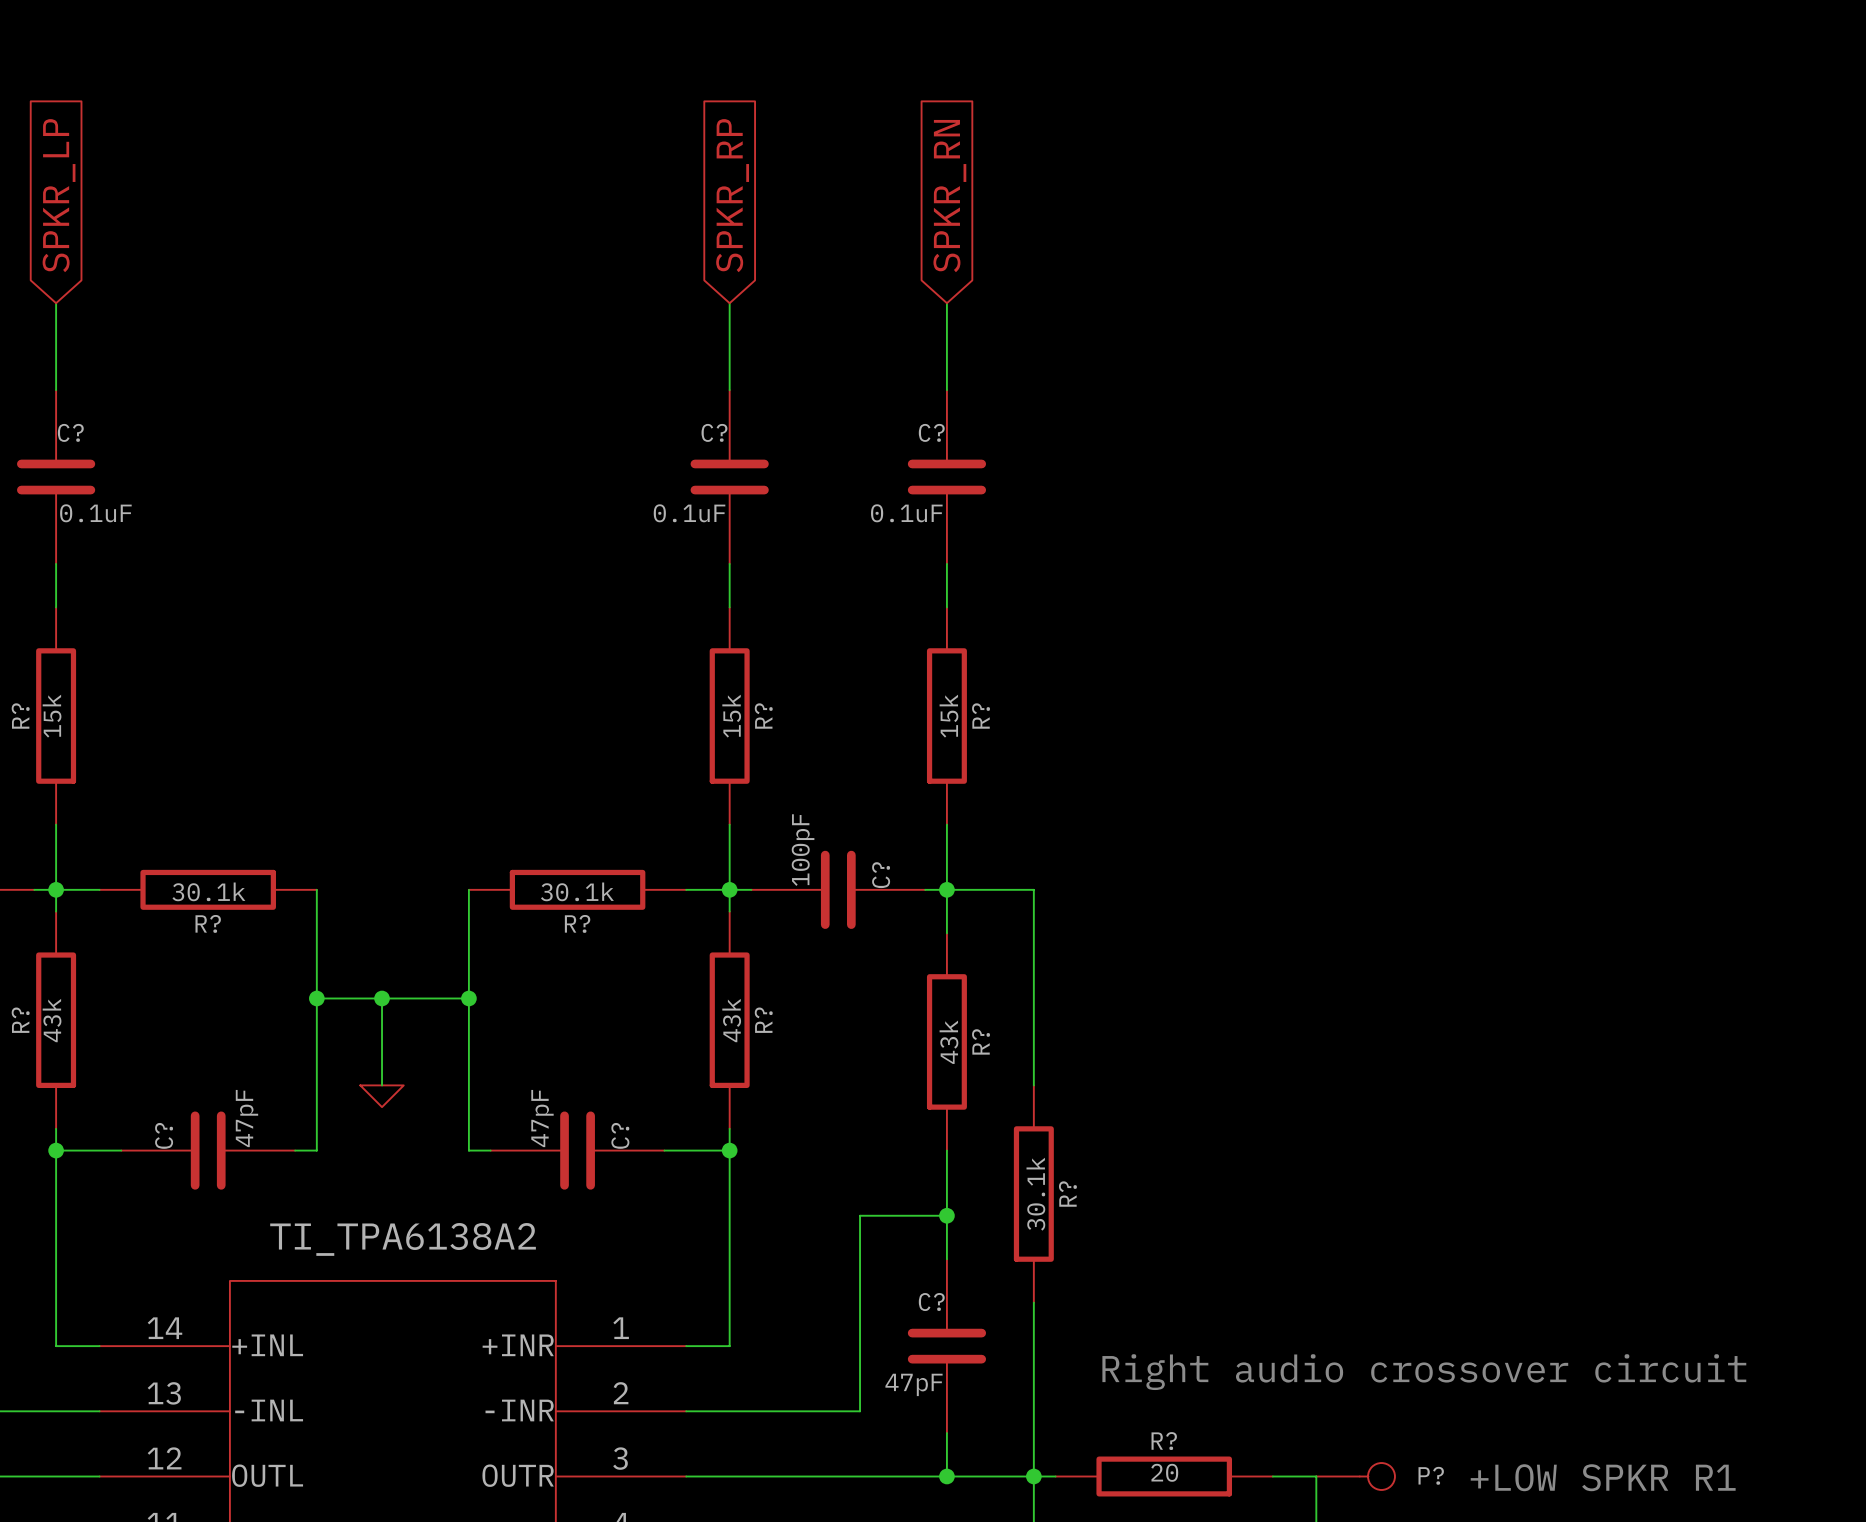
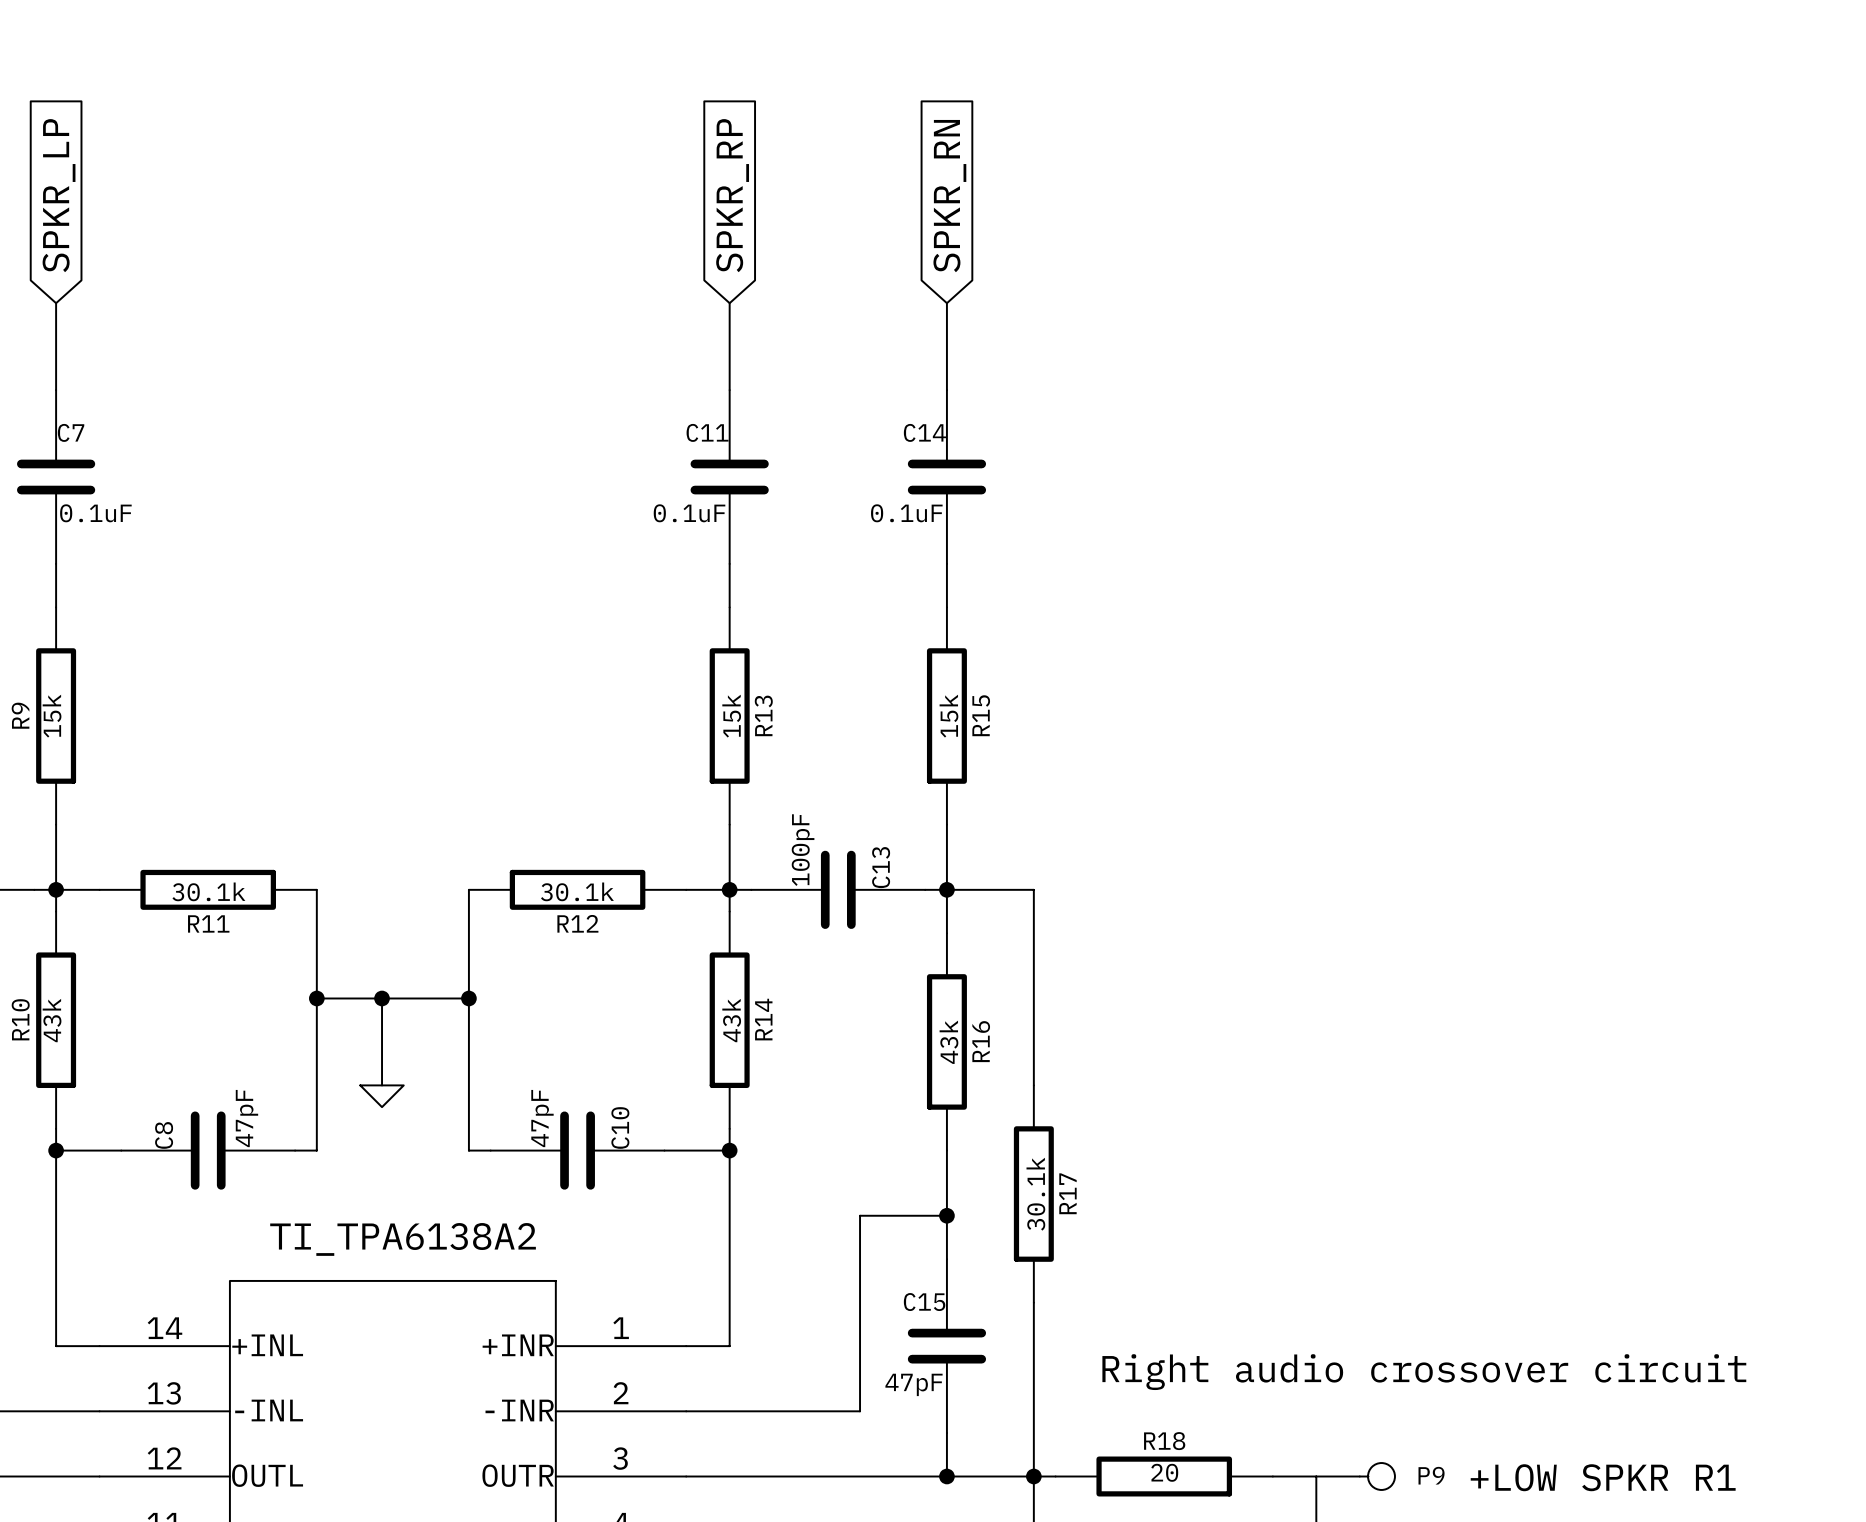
C? name: C? (70, 432) -> C7 (71, 432)
C? name: C? (714, 432) -> C11 (707, 432)
C? name: C? (931, 432) -> C14 (924, 432)
R? name: R? (20, 716) -> R9 (20, 715)
R? name: R? (763, 716) -> R13 (763, 715)
R? name: R? (981, 716) -> R15 (981, 715)
C? name: C? (881, 875) -> C13 (881, 867)
R? name: R? (208, 923) -> R11 (208, 923)
R? name: R? (577, 923) -> R12 (577, 923)
R? name: R? (20, 1020) -> R10 (20, 1019)
R? name: R? (763, 1020) -> R14 (763, 1019)
R? name: R? (981, 1041) -> R16 (981, 1041)
C? name: C? (164, 1135) -> C8 (164, 1135)
C? name: C? (620, 1135) -> C10 (620, 1127)
R? name: R? (1067, 1194) -> R17 (1067, 1193)
C? name: C? (931, 1302) -> C15 (924, 1302)
R? name: R? (1164, 1441) -> R18 (1164, 1441)
P? name: P? (1431, 1475) -> P9 (1431, 1475)

